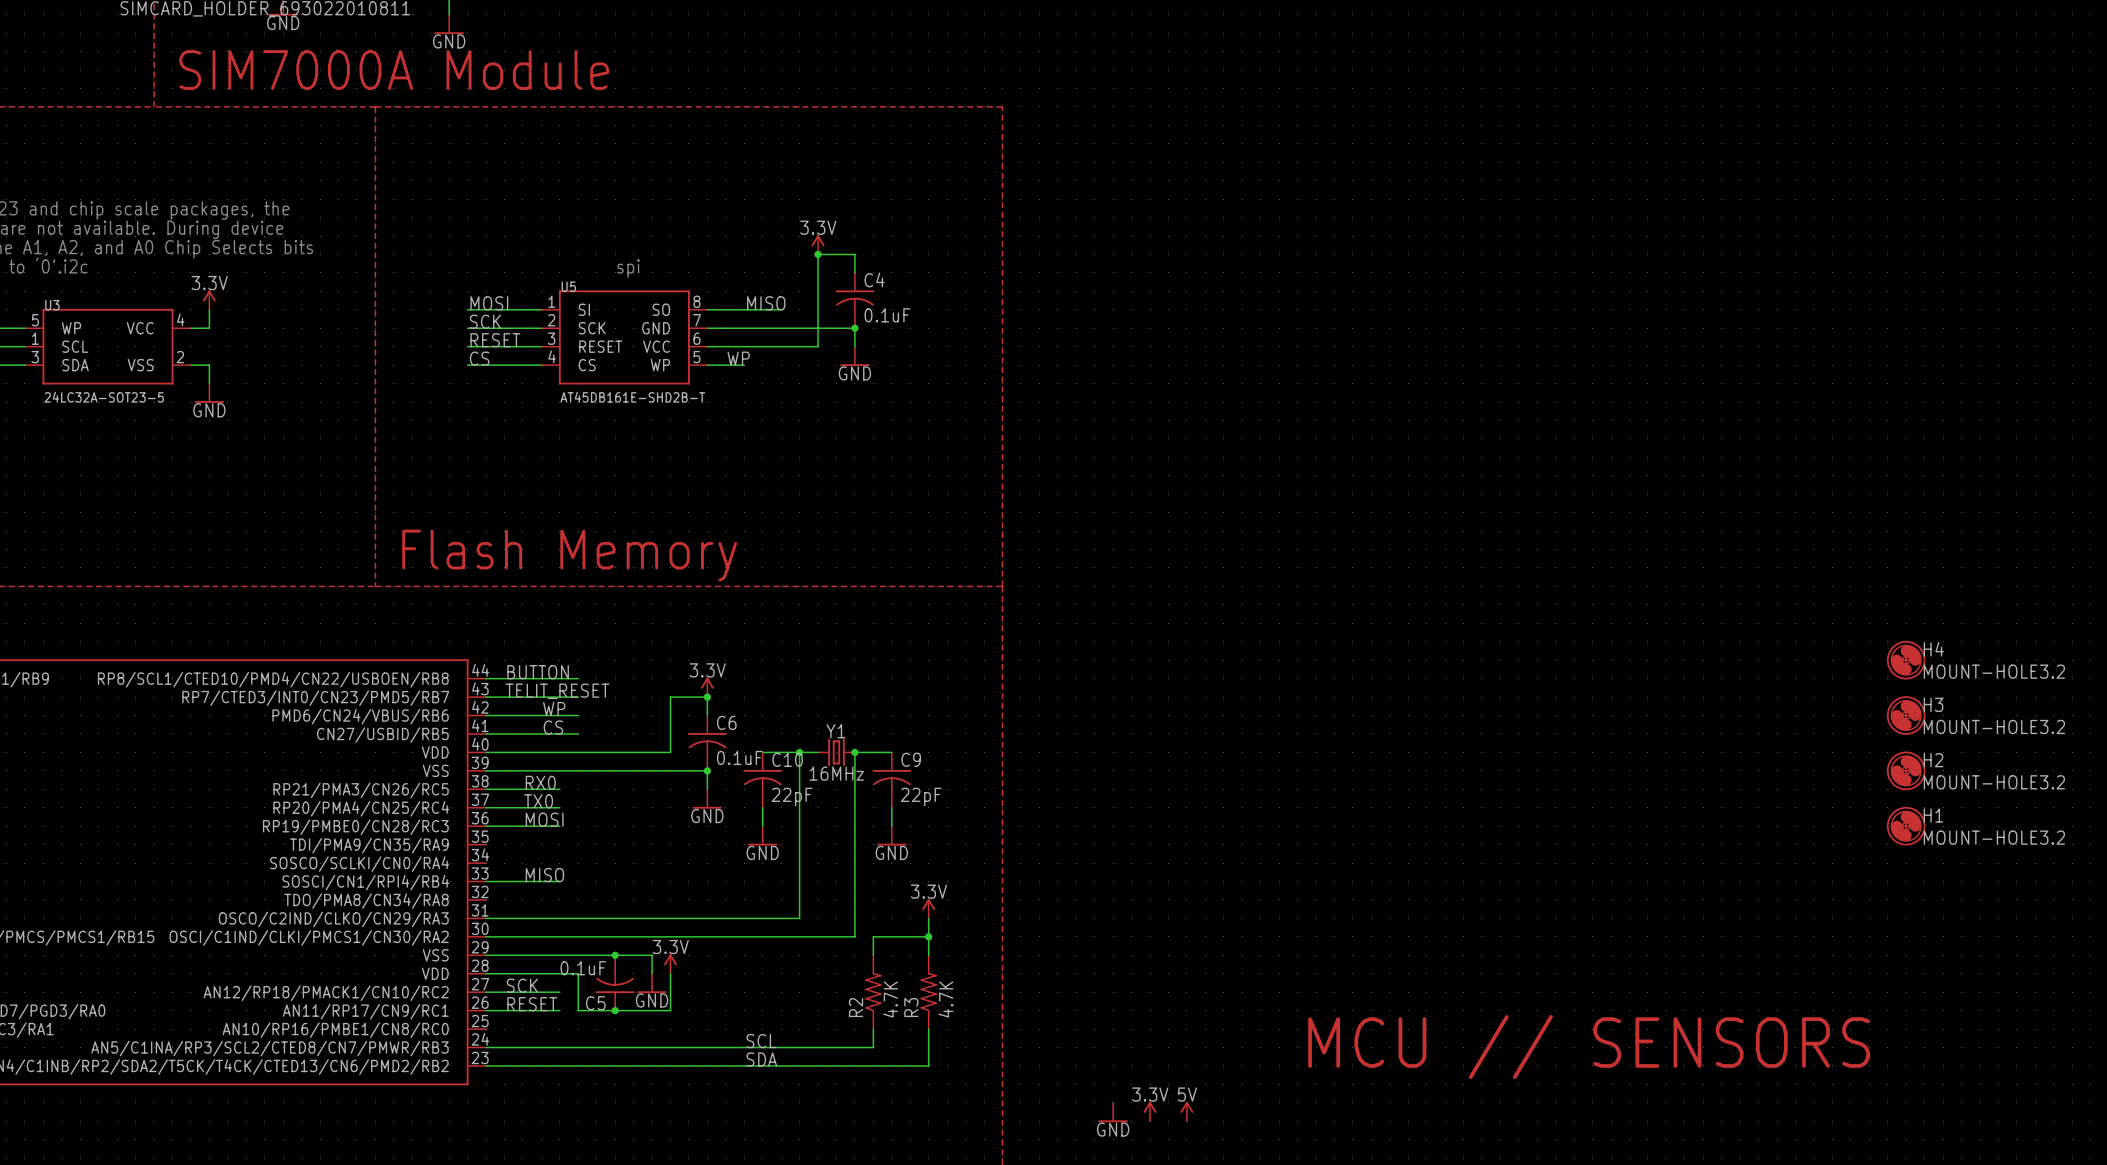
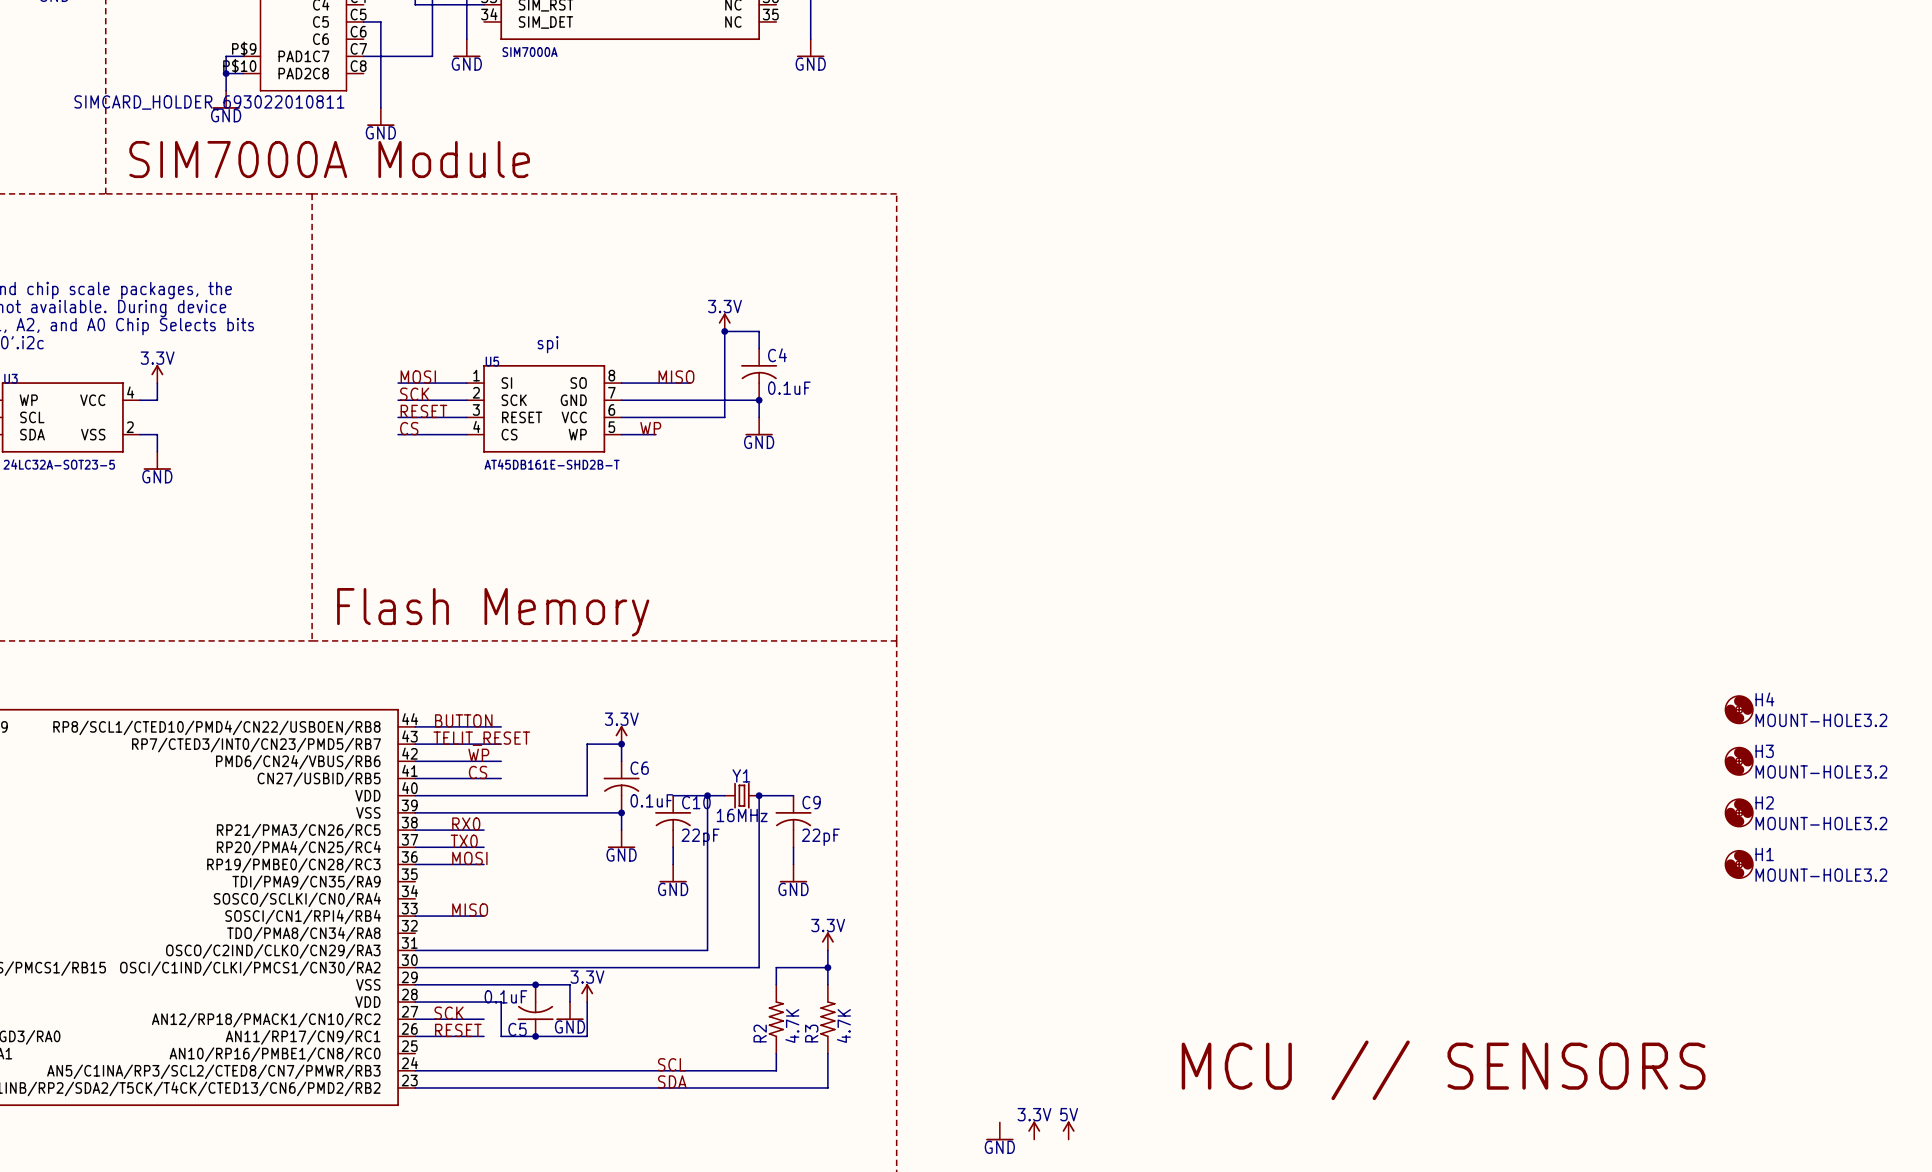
part: (1906, 660) -> none
part: (1906, 715) -> none
part: (1906, 770) -> none
part: (1906, 826) -> none

